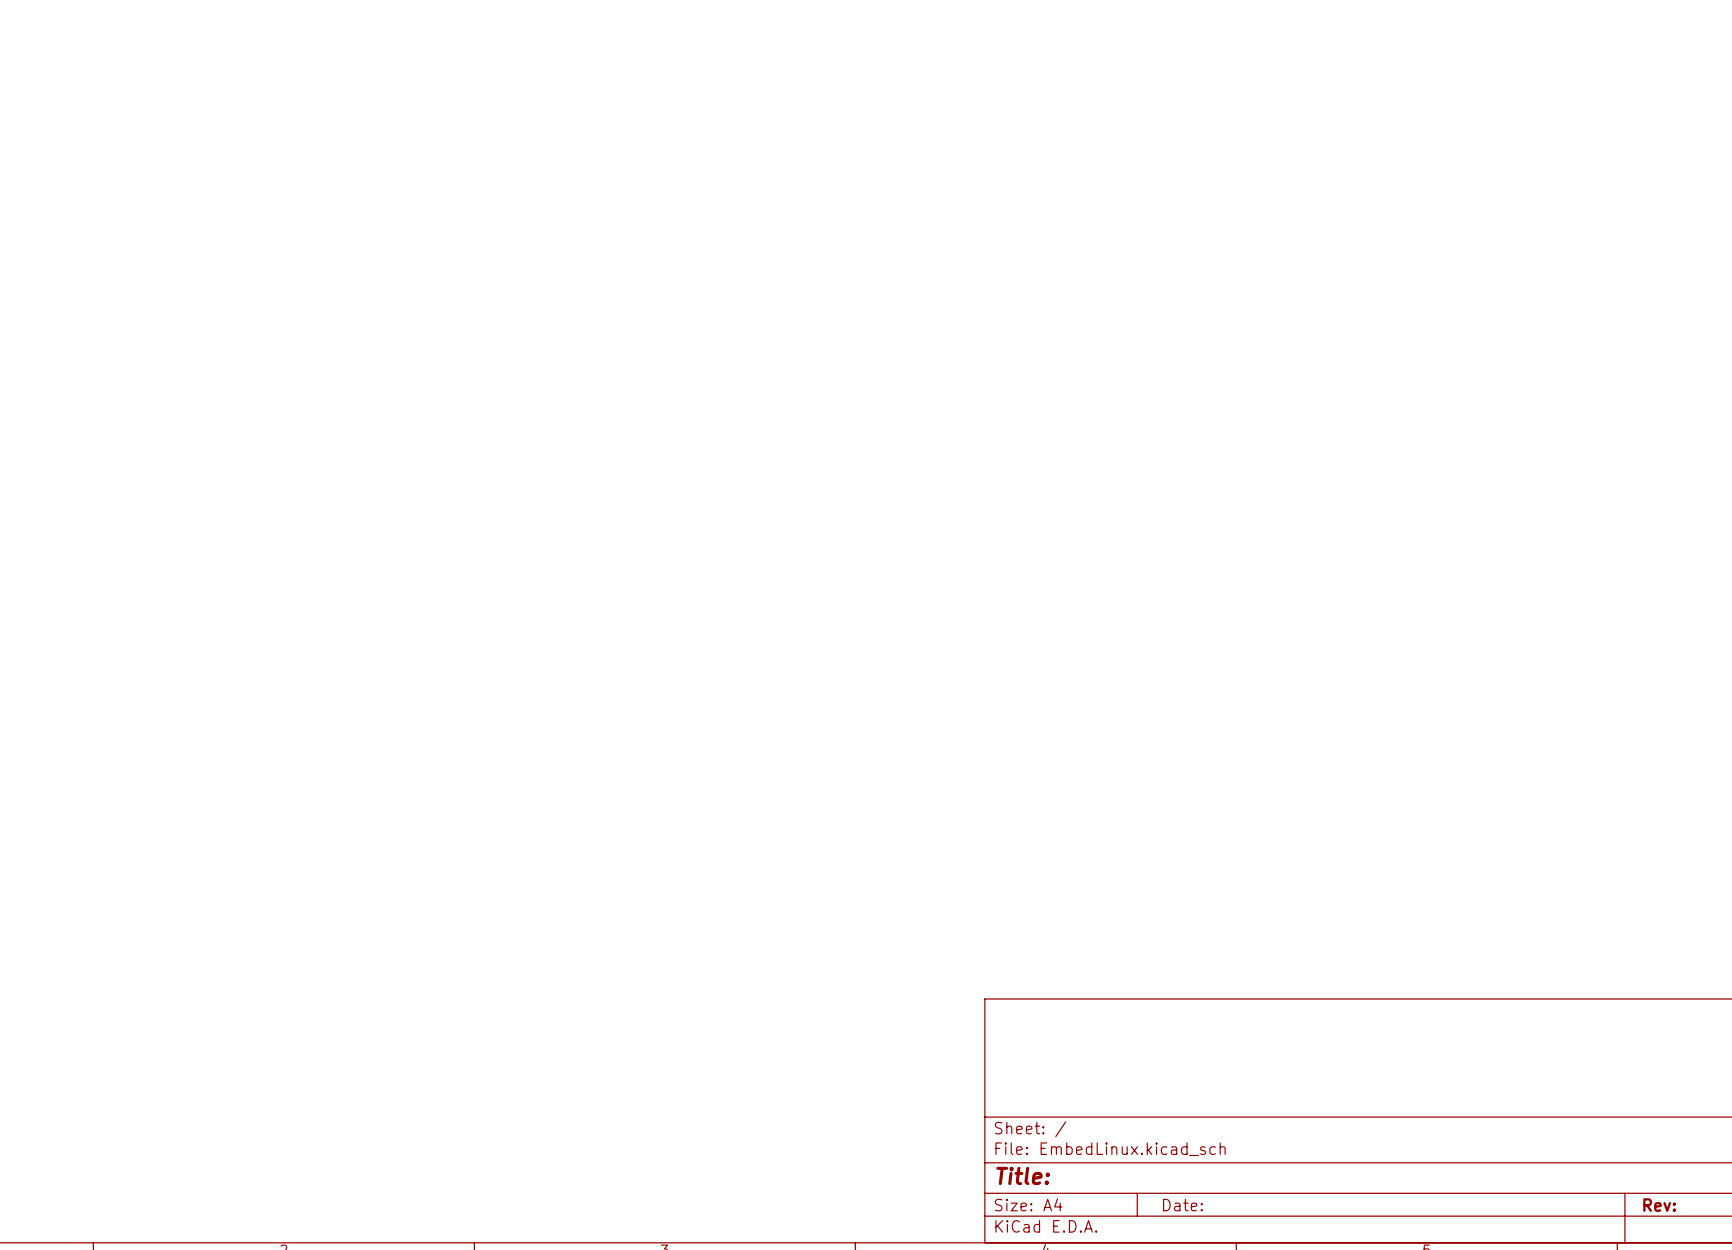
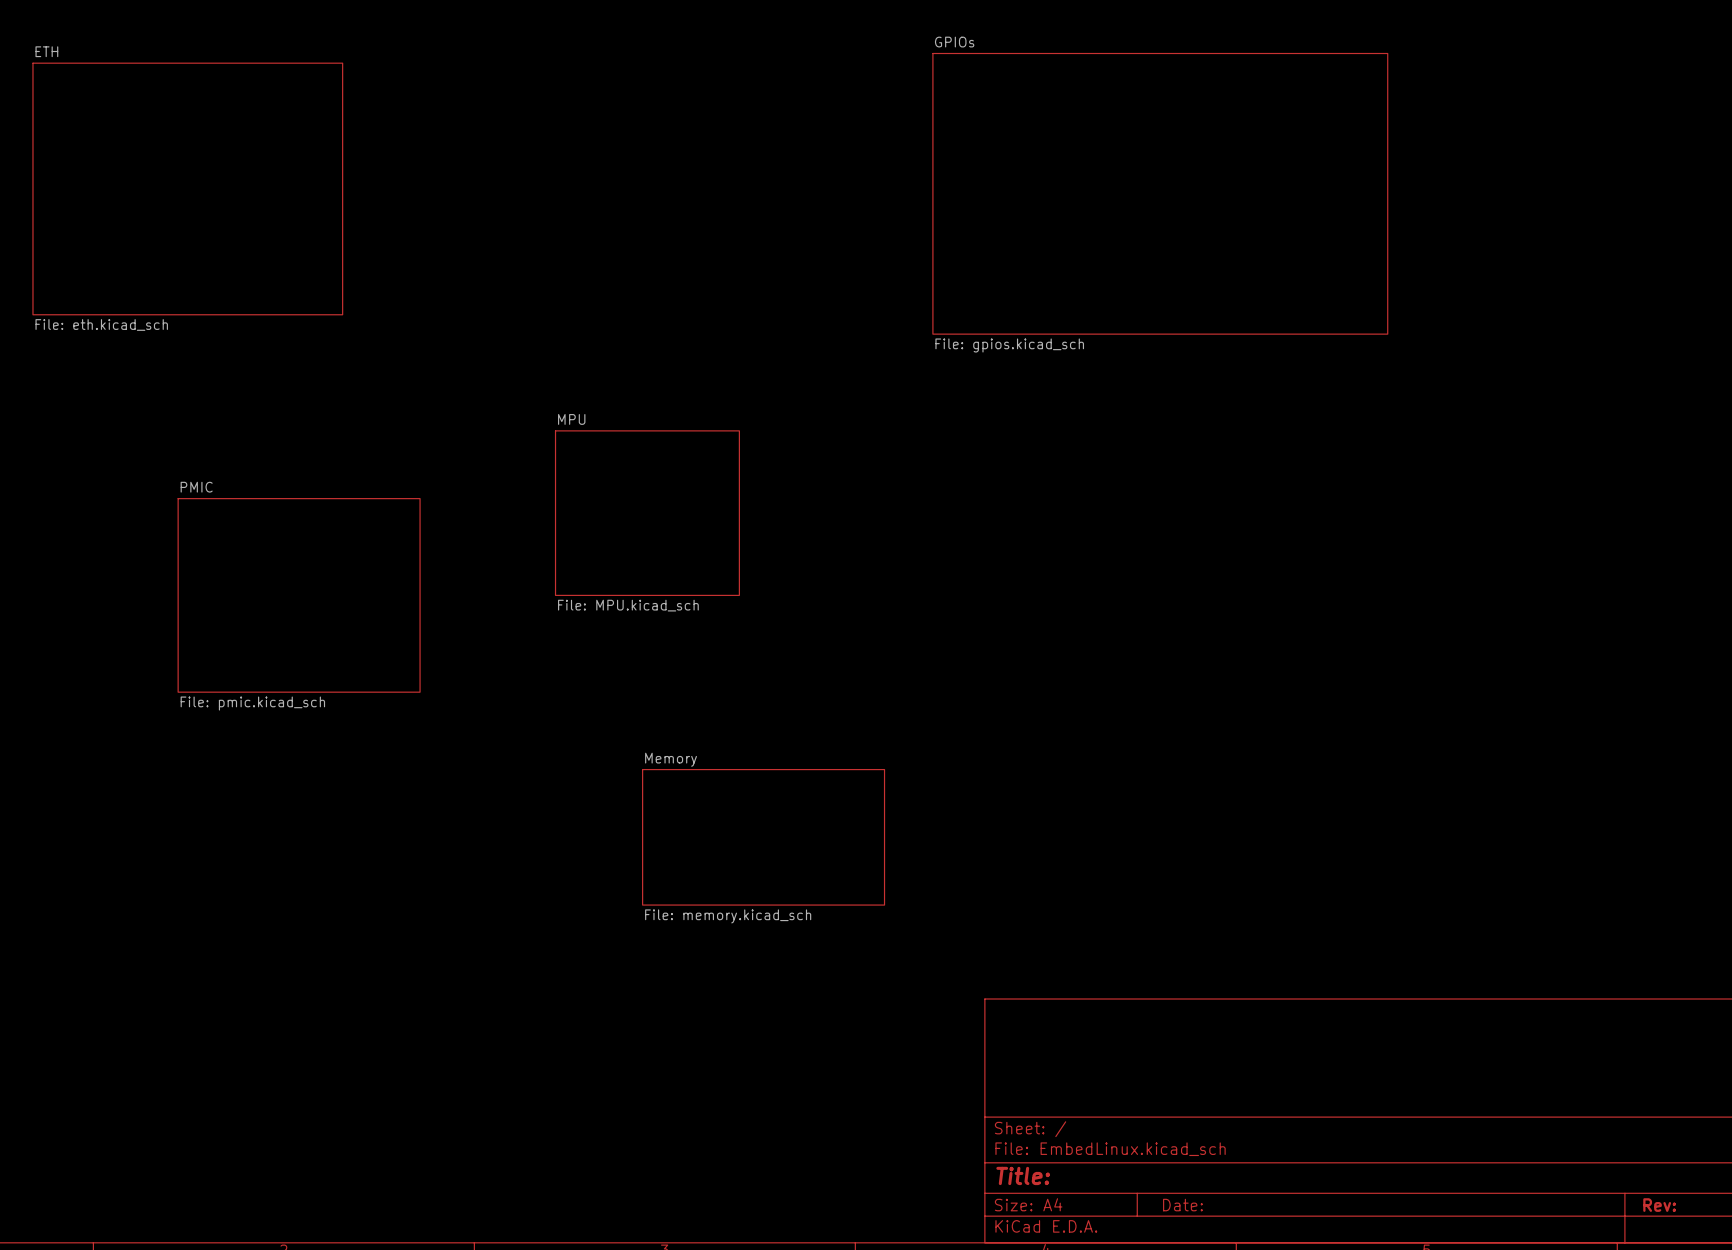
sheet ETH: none -> File: eth.kicad_sch (187, 188)
sheet GPIOs: none -> File: gpios.kicad_sch (1160, 193)
sheet MPU: none -> File: MPU.kicad_sch (647, 513)
sheet PMIC: none -> File: pmic.kicad_sch (299, 595)
sheet Memory: none -> File: memory.kicad_sch (763, 837)

